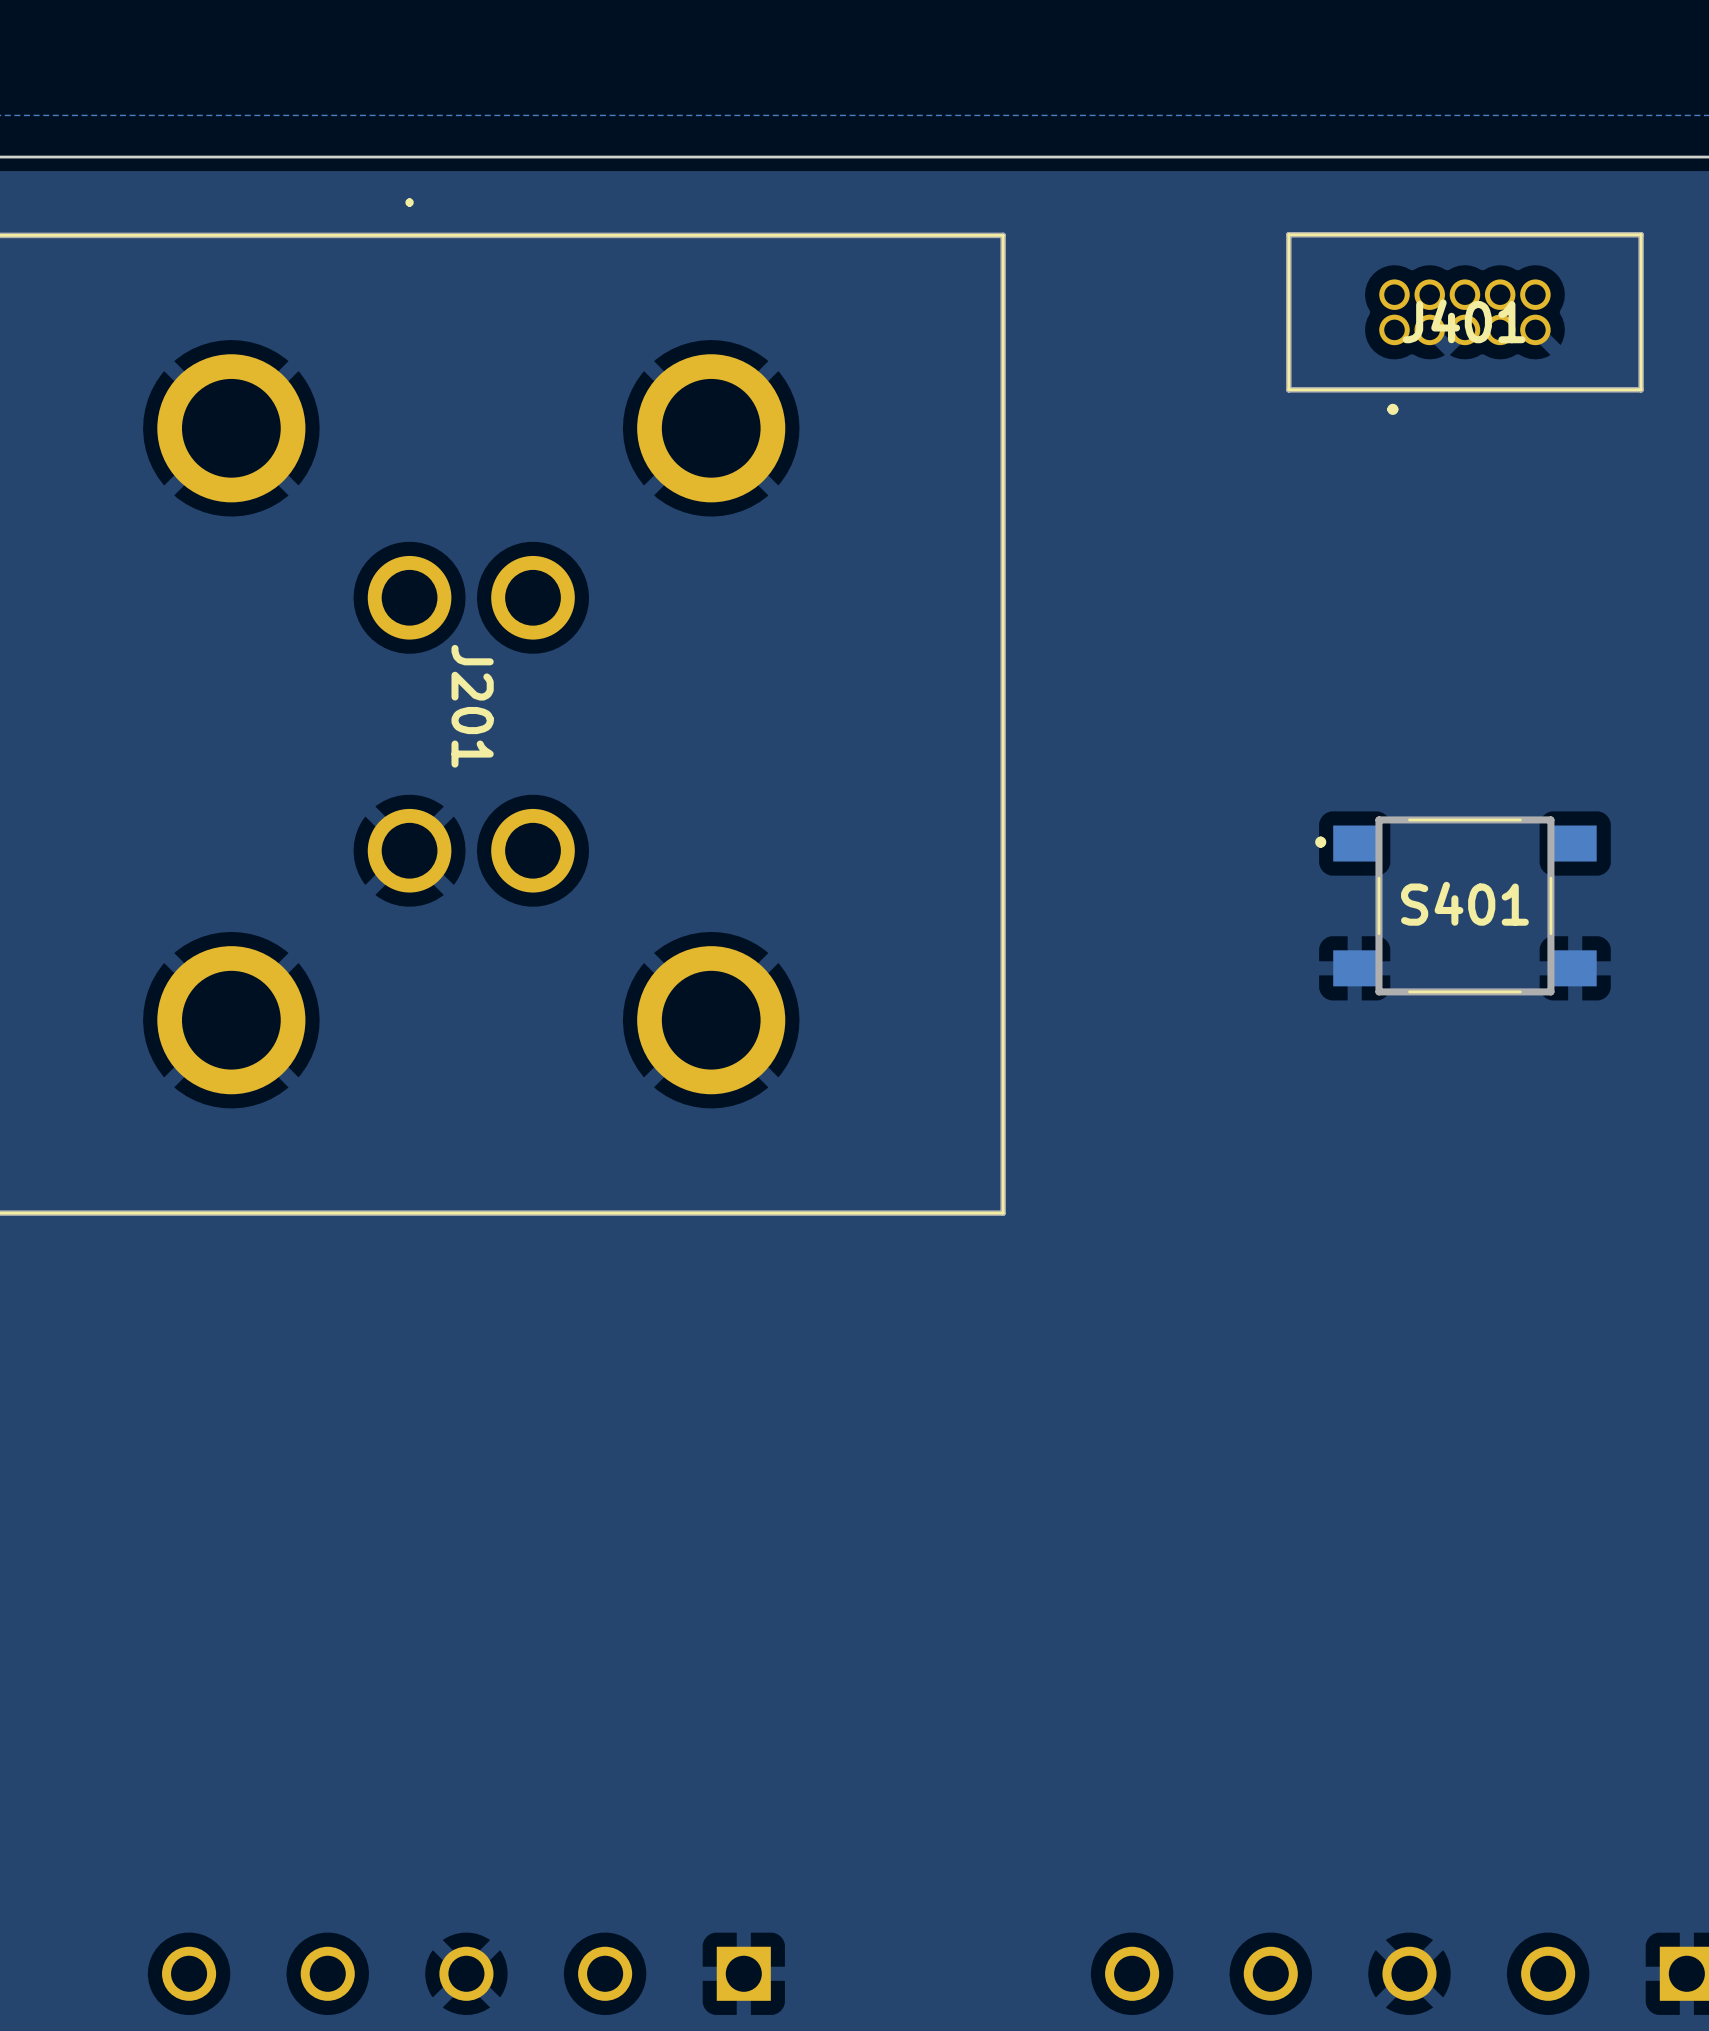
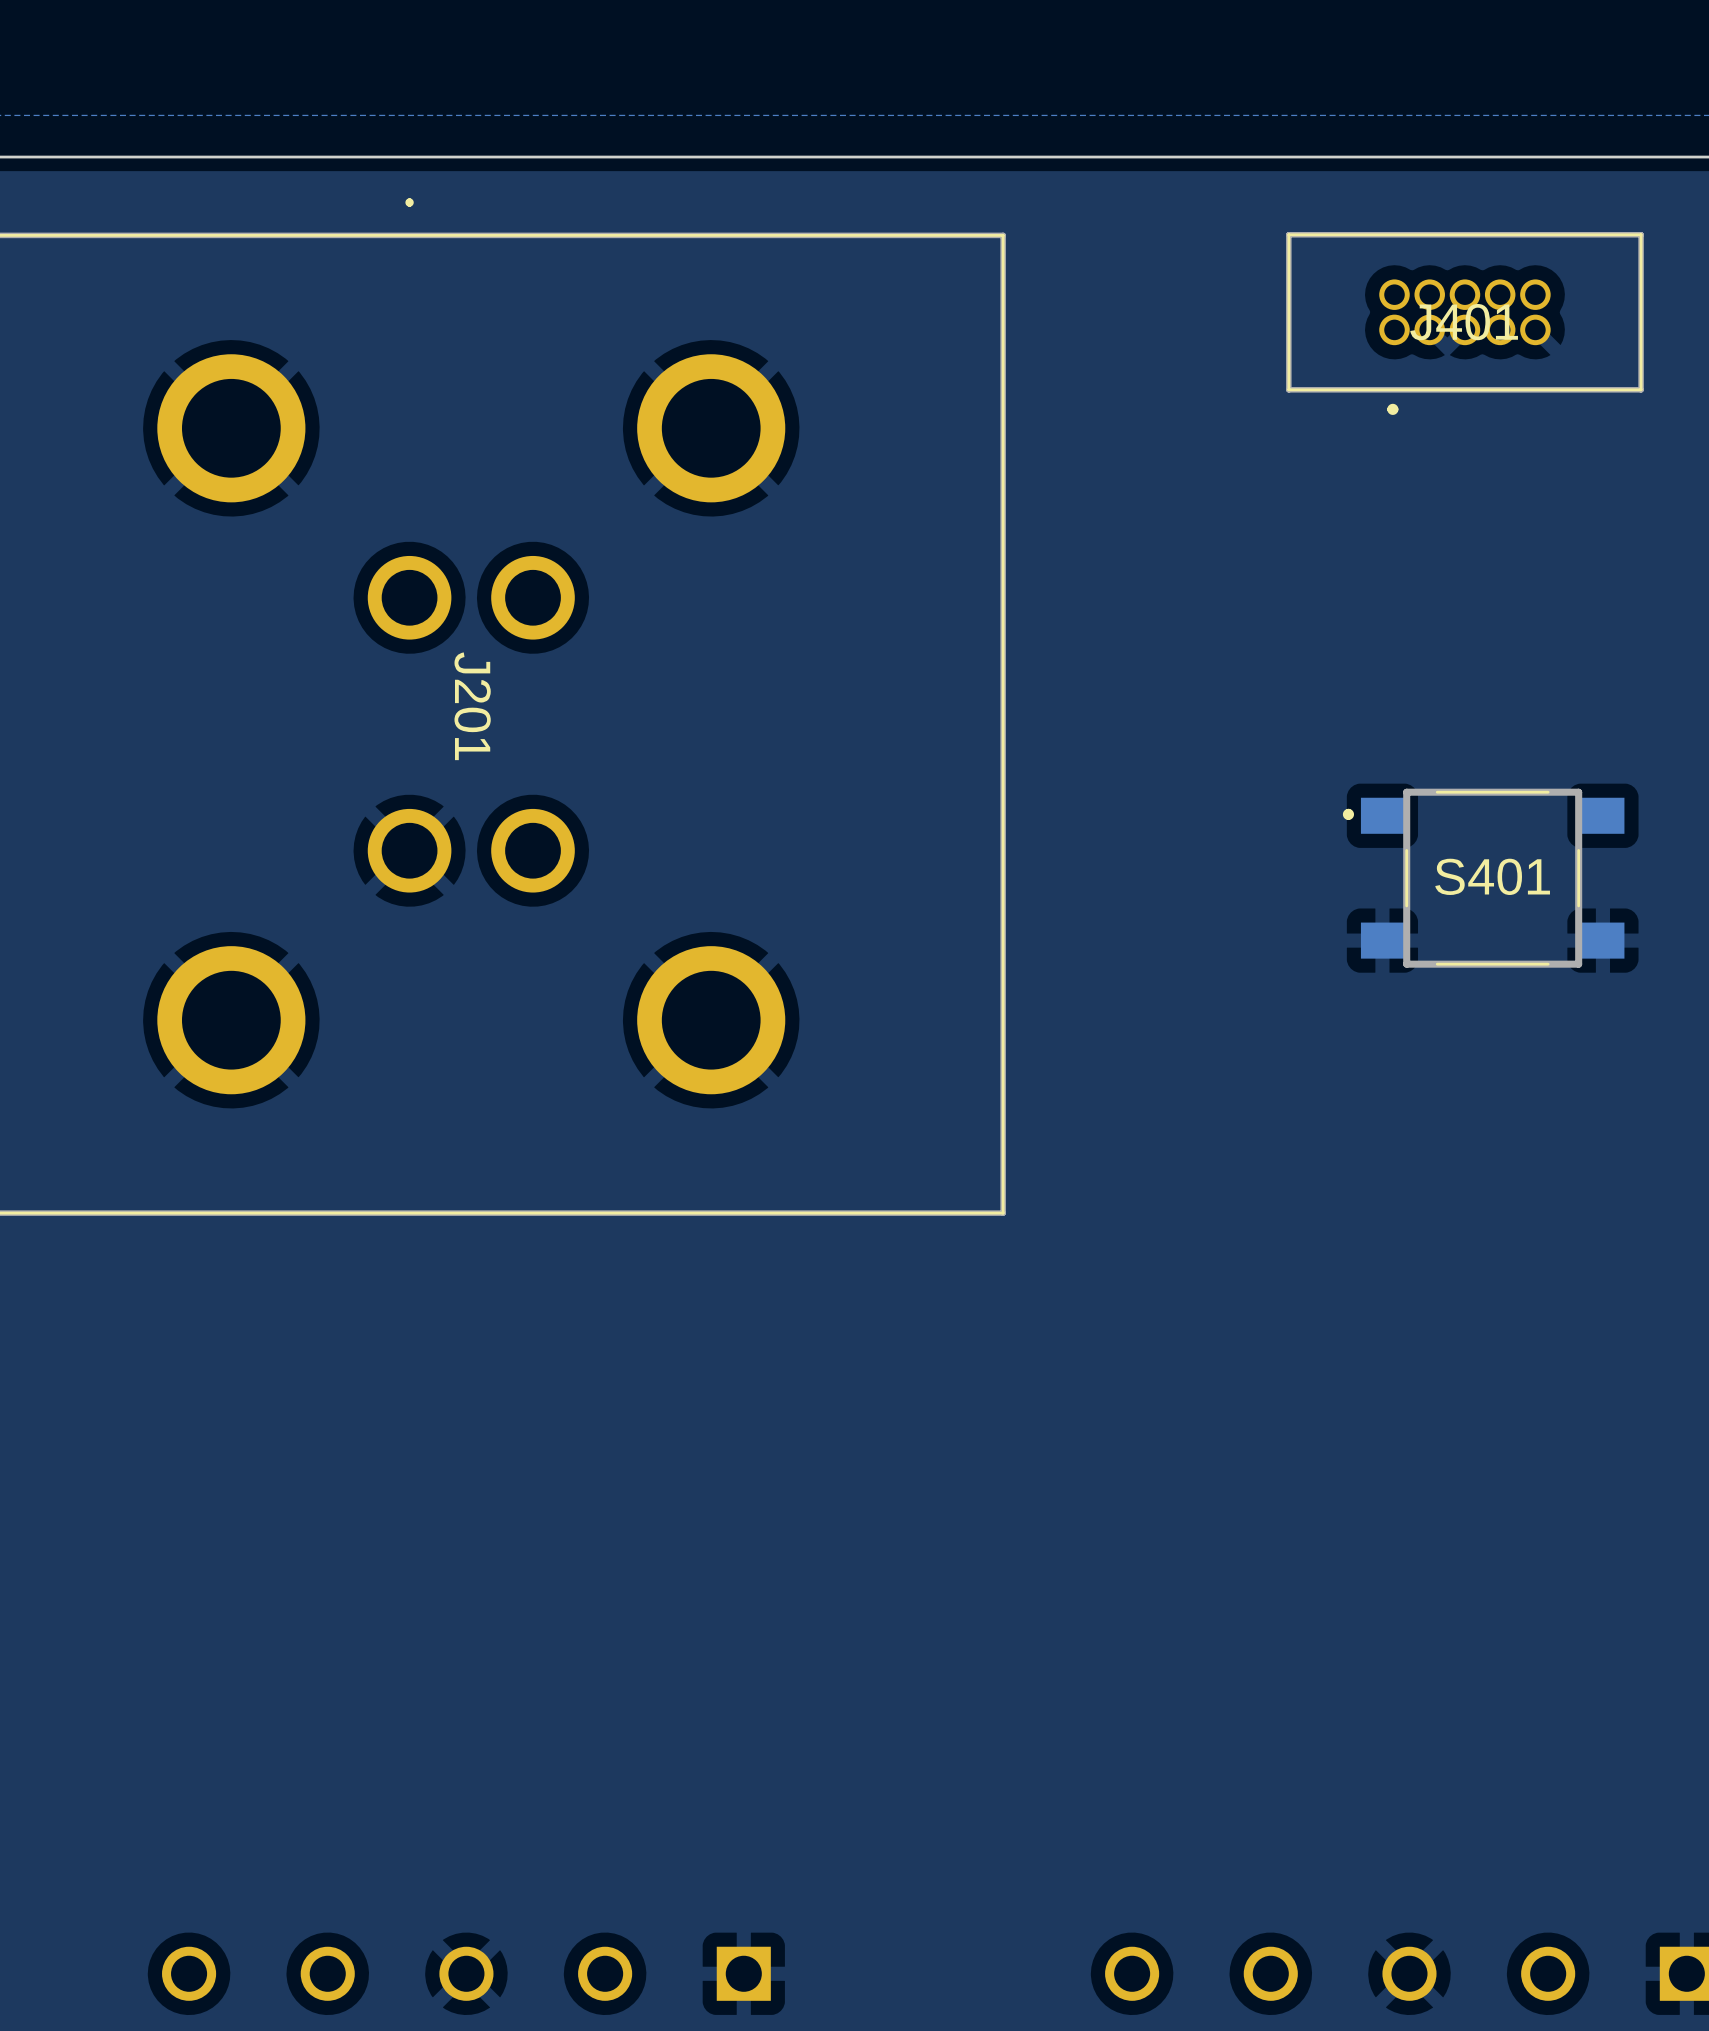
S401 position: (1455, 905) -> (1483, 878)

